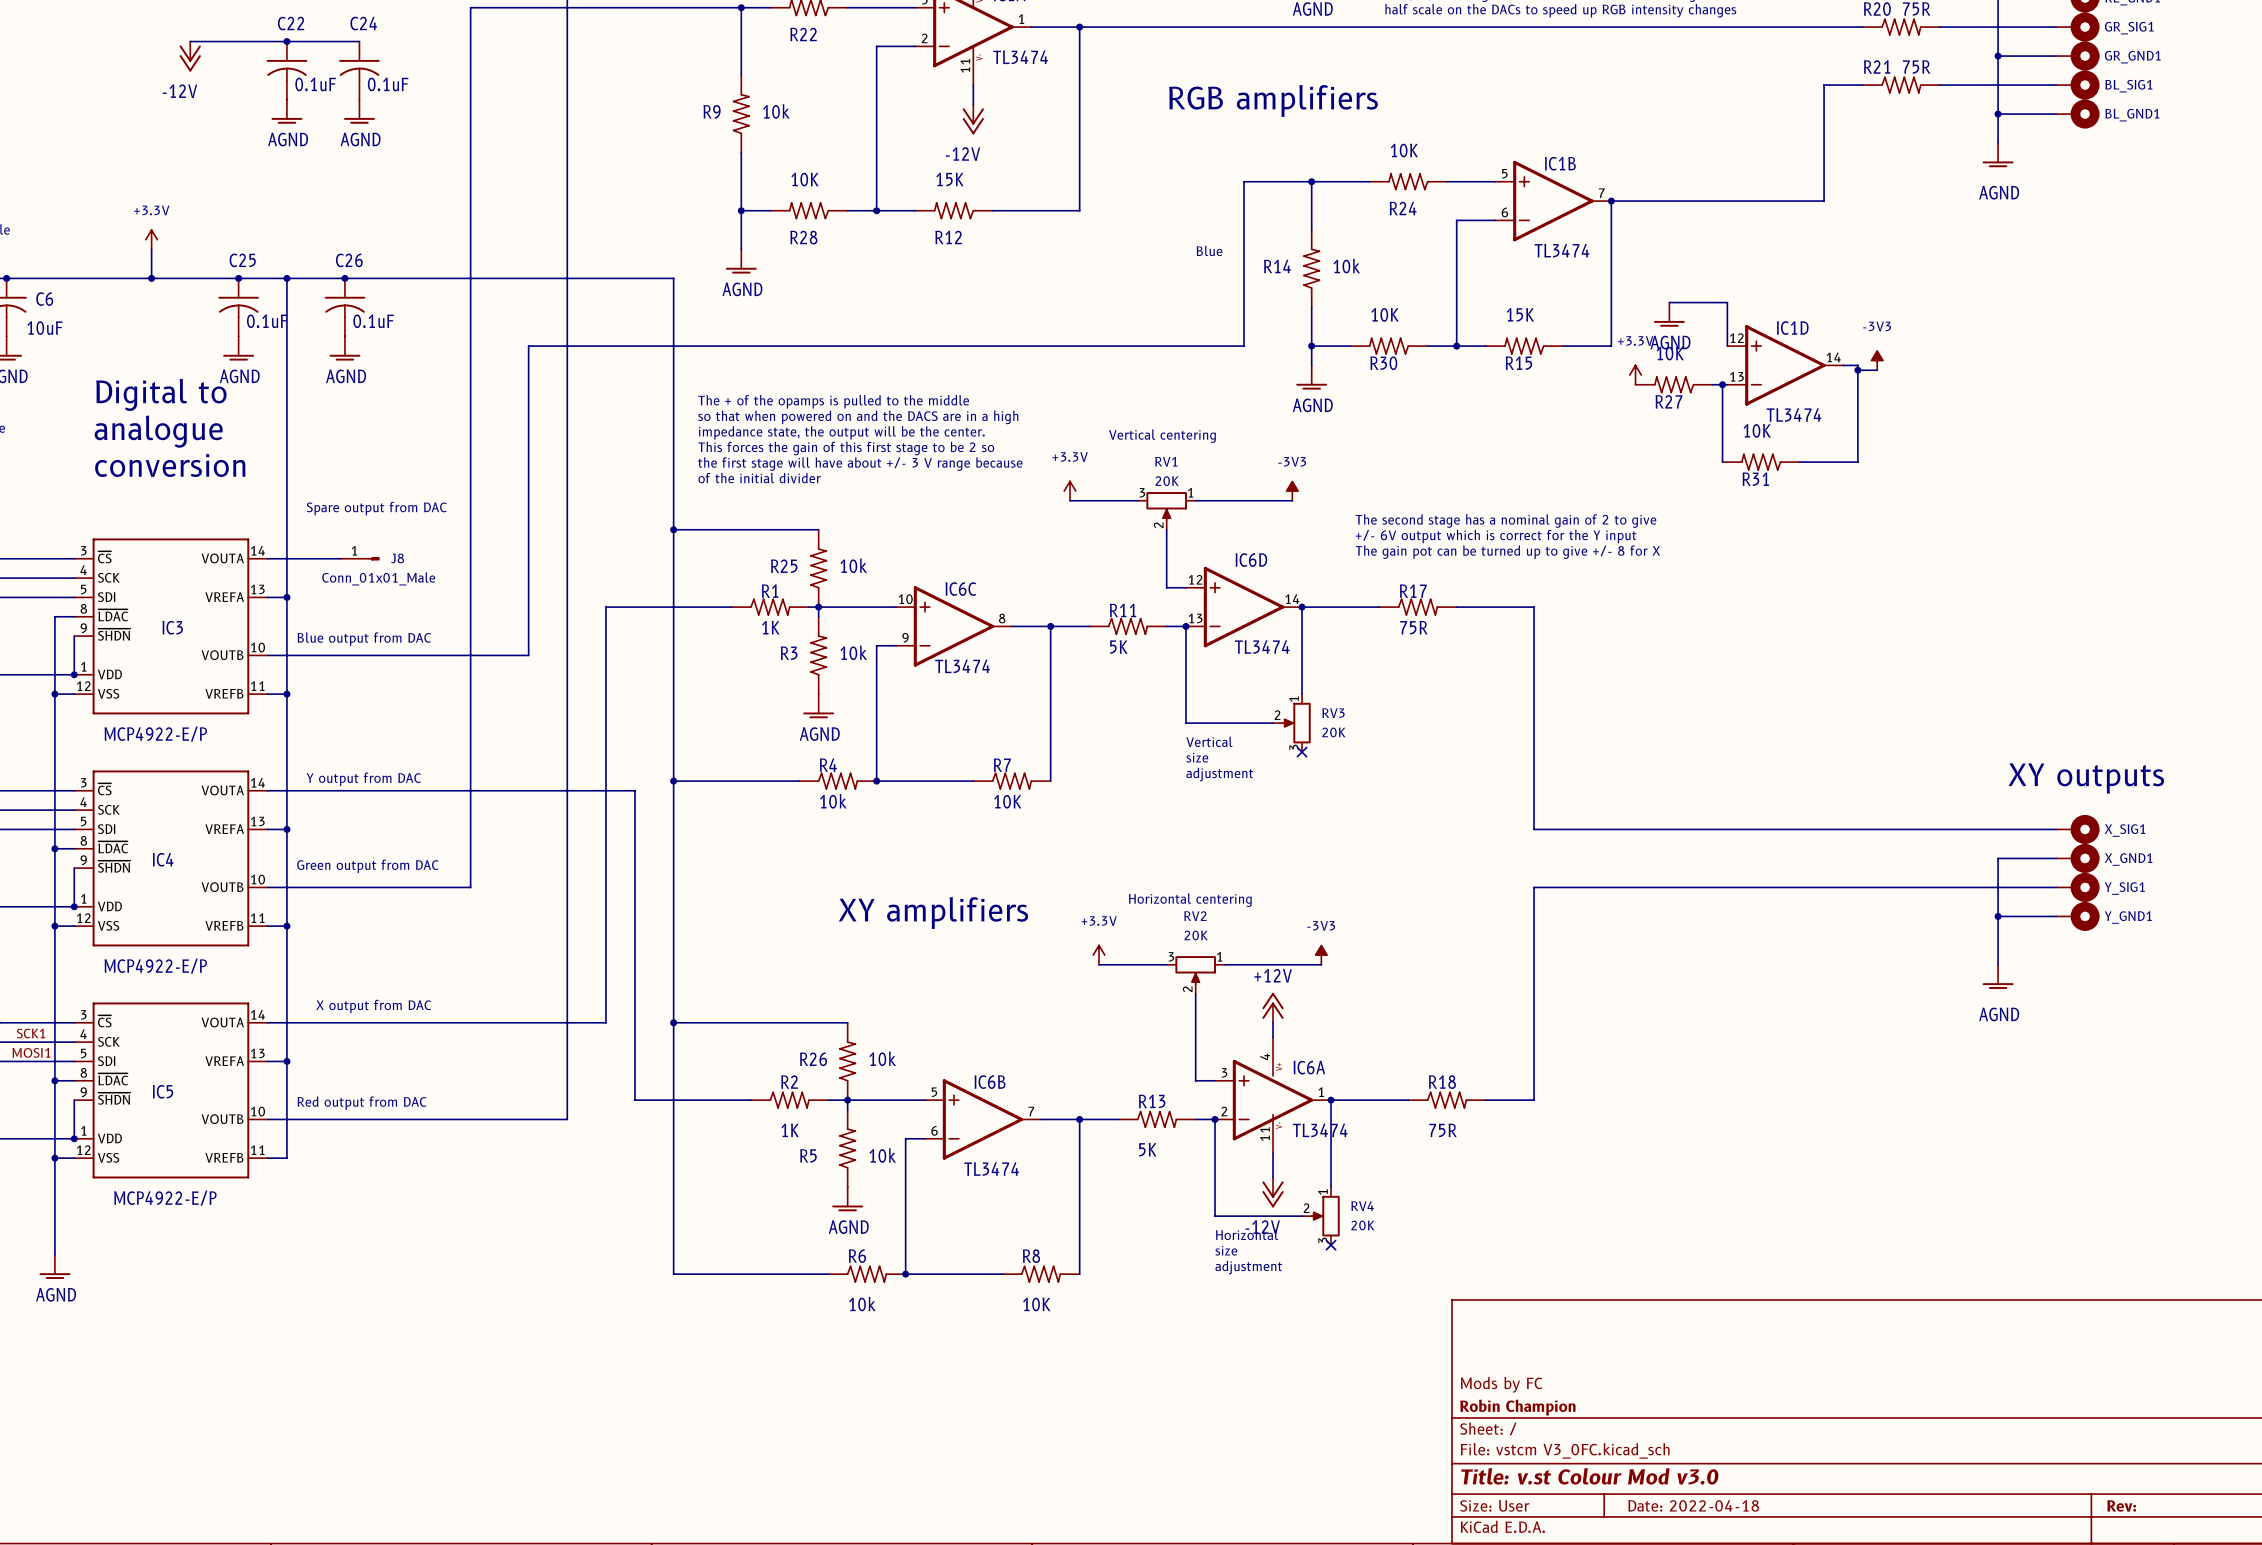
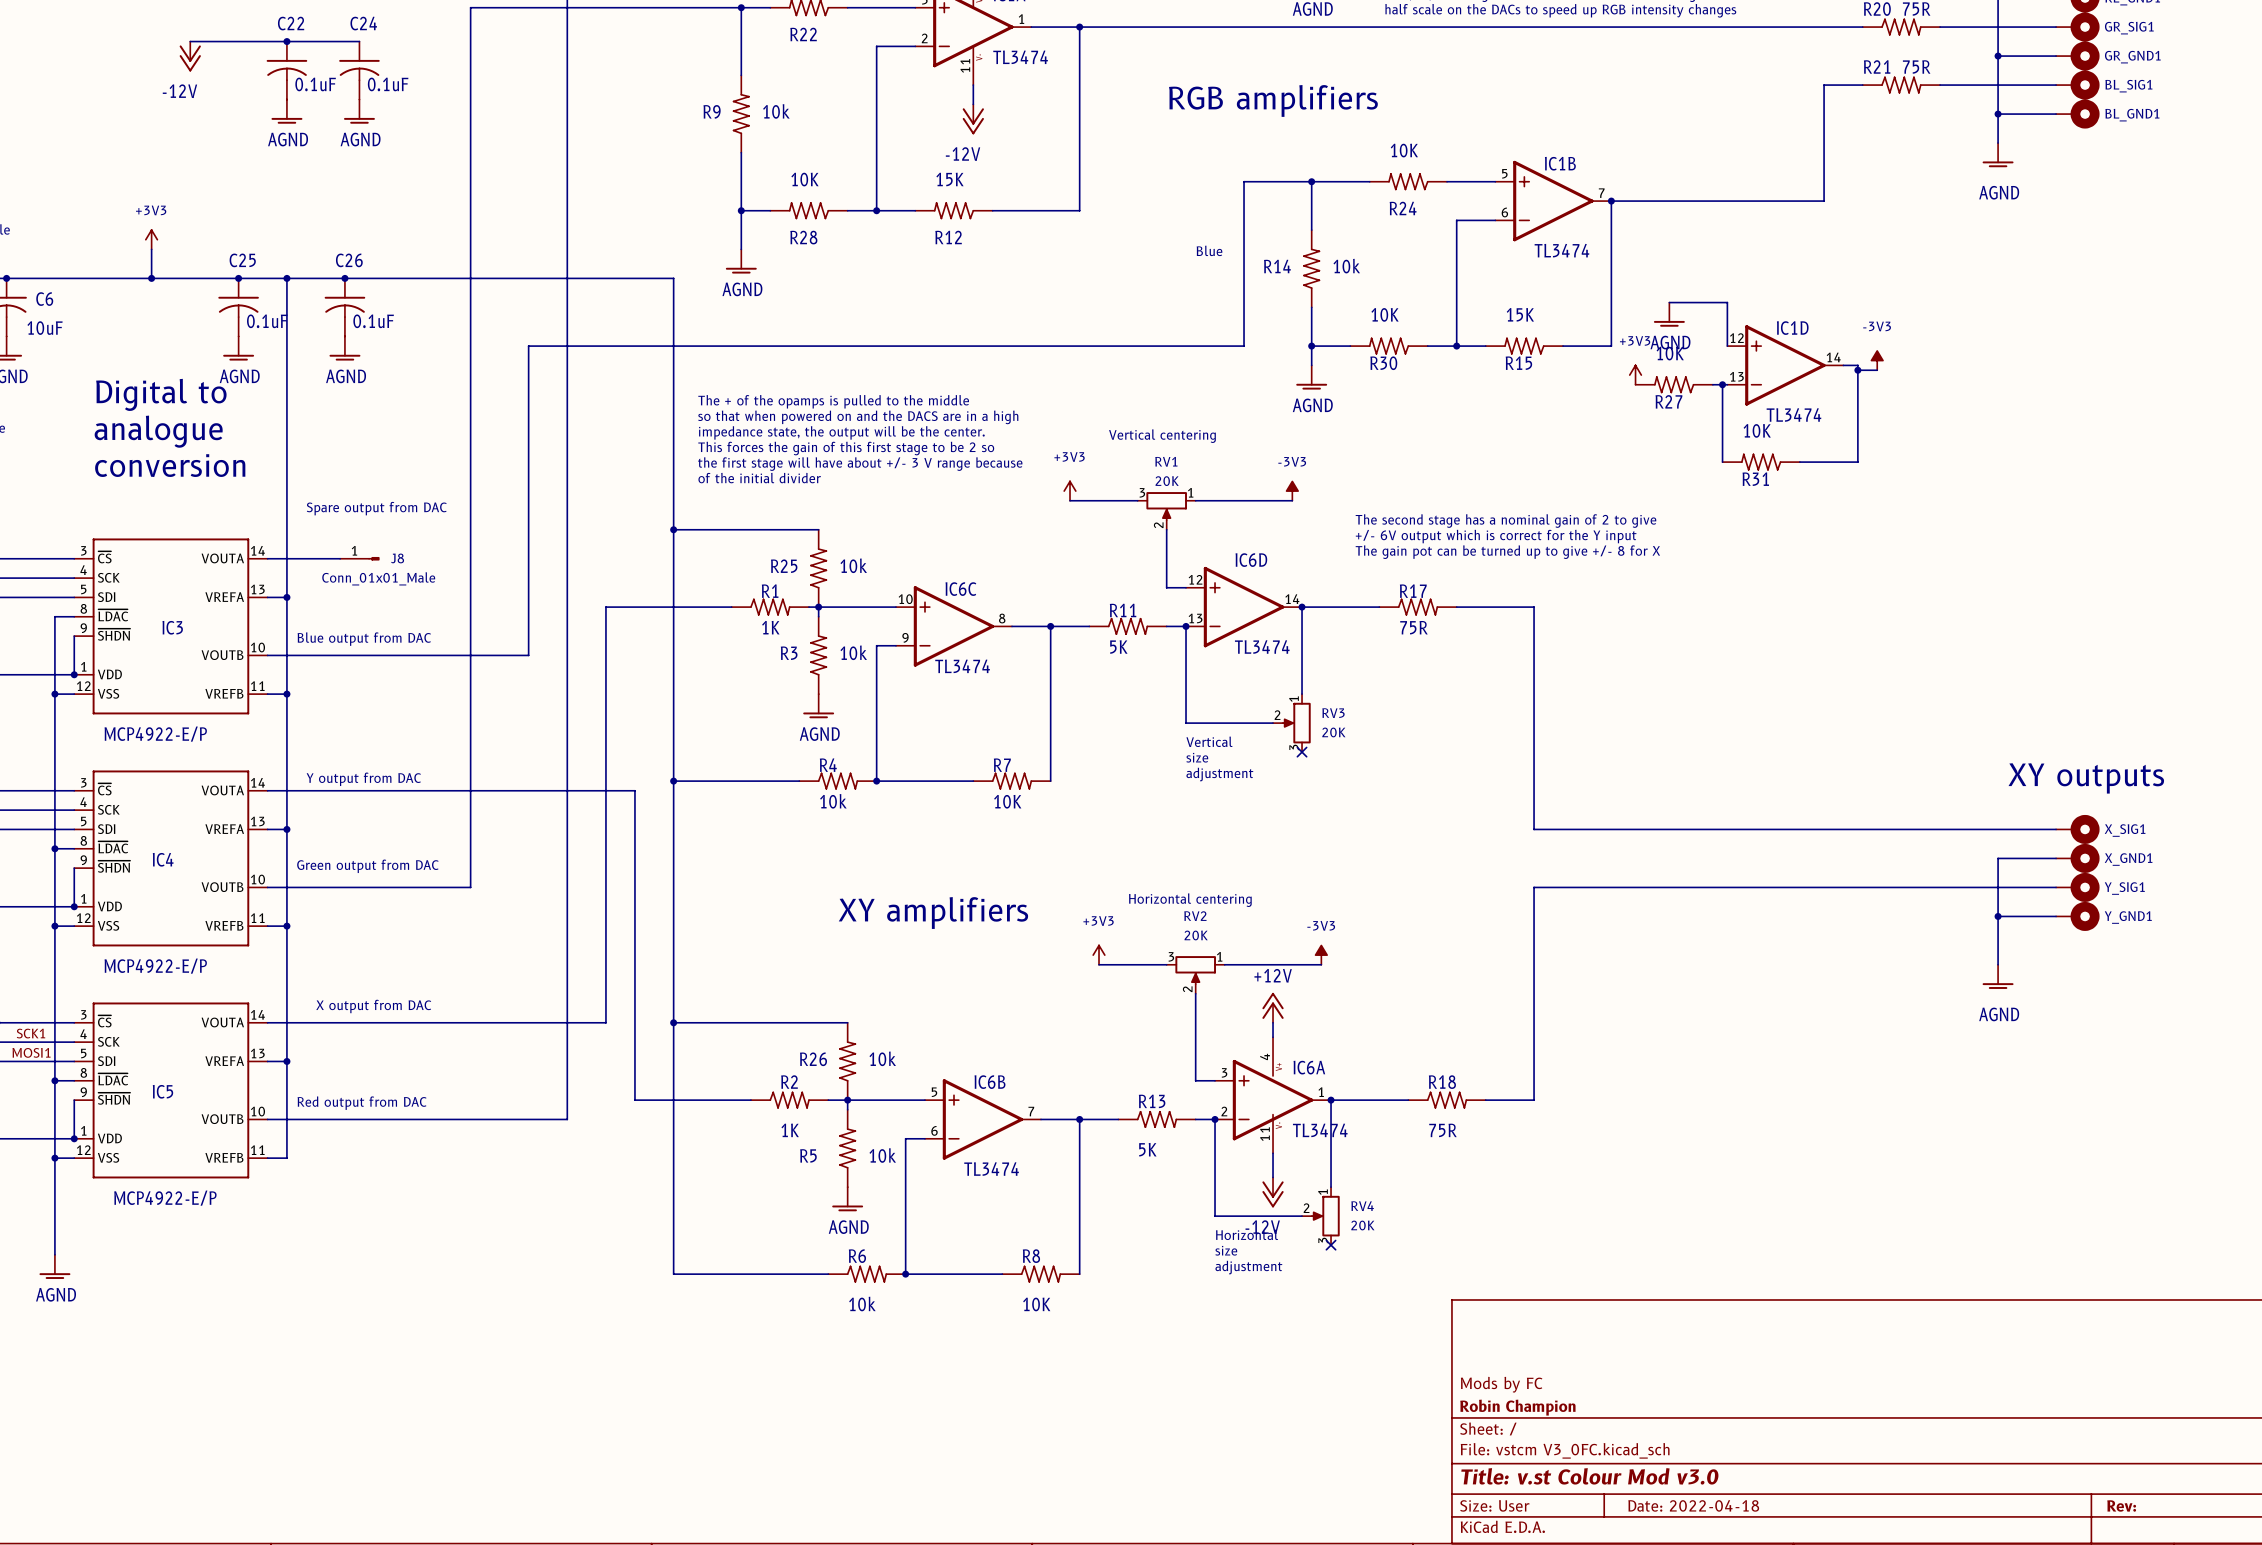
power symbol: +3.3V (151, 239) -> +3V3 (151, 239)
power symbol: +3.3V (1635, 375) -> +3V3 (1635, 375)
power symbol: +3.3V (1070, 491) -> +3V3 (1070, 491)
power symbol: +3.3V (1099, 955) -> +3V3 (1099, 955)

